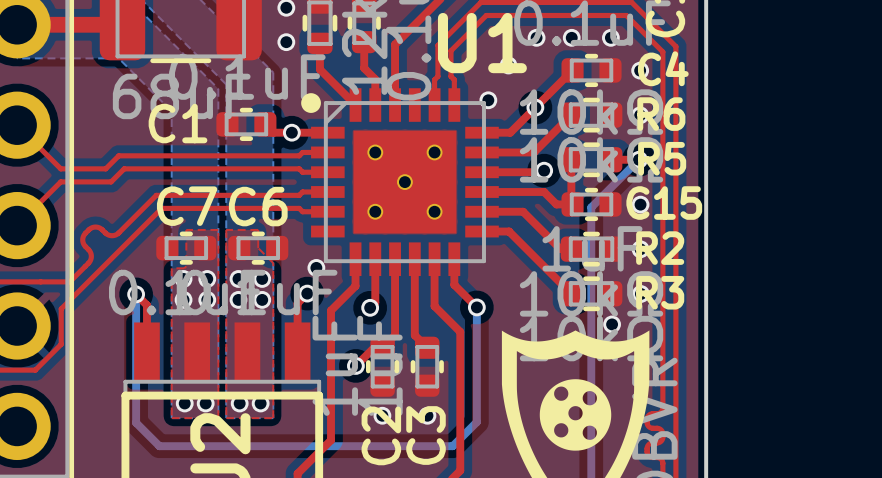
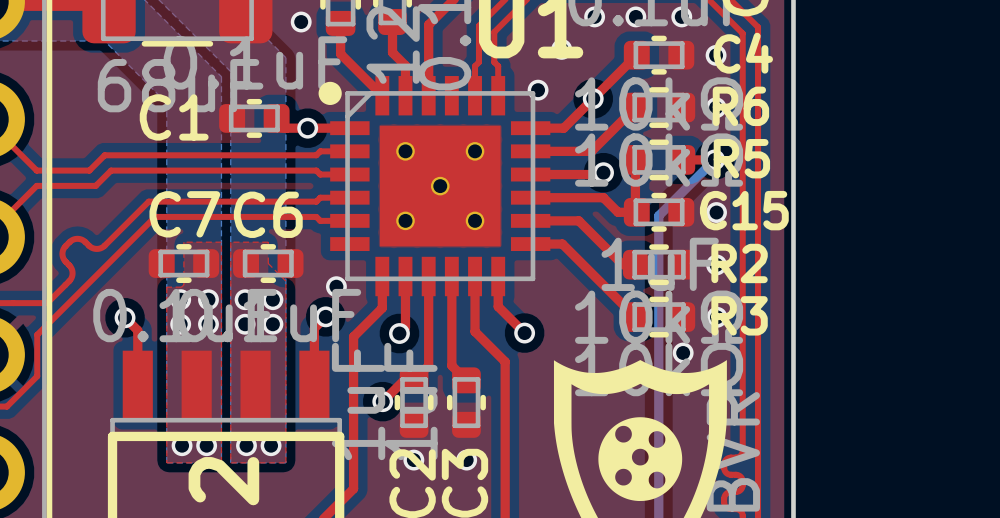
bottom track: (136, 294) (136, 422) (159, 446) (452, 446) (476, 422) (476, 307) -> none

